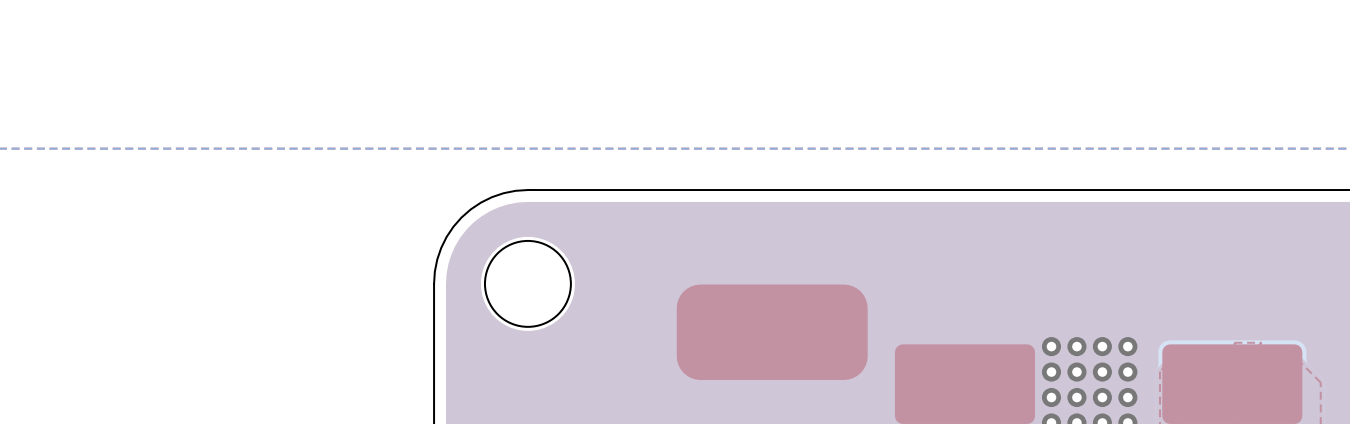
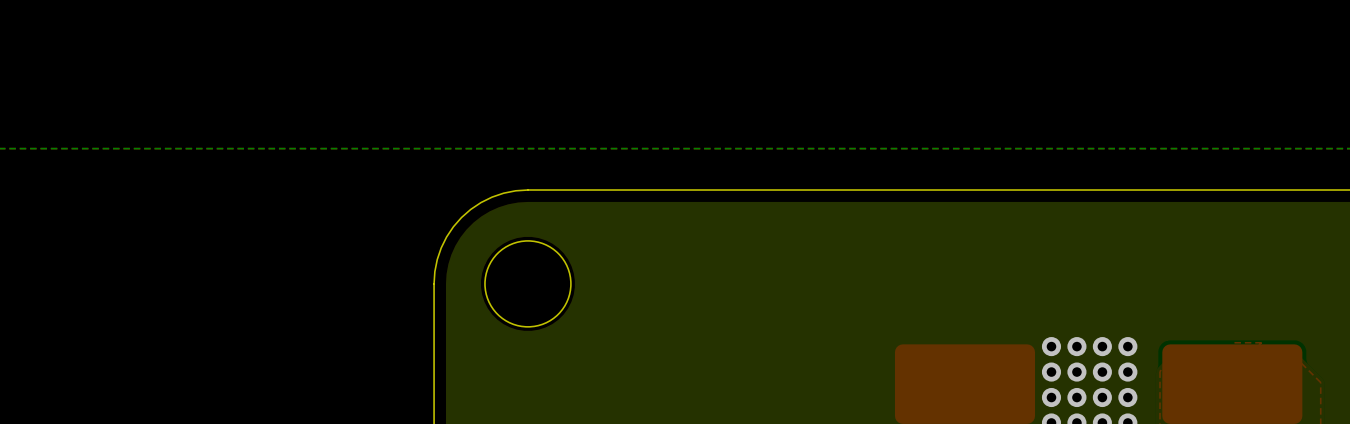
part: (772, 332) -> none

